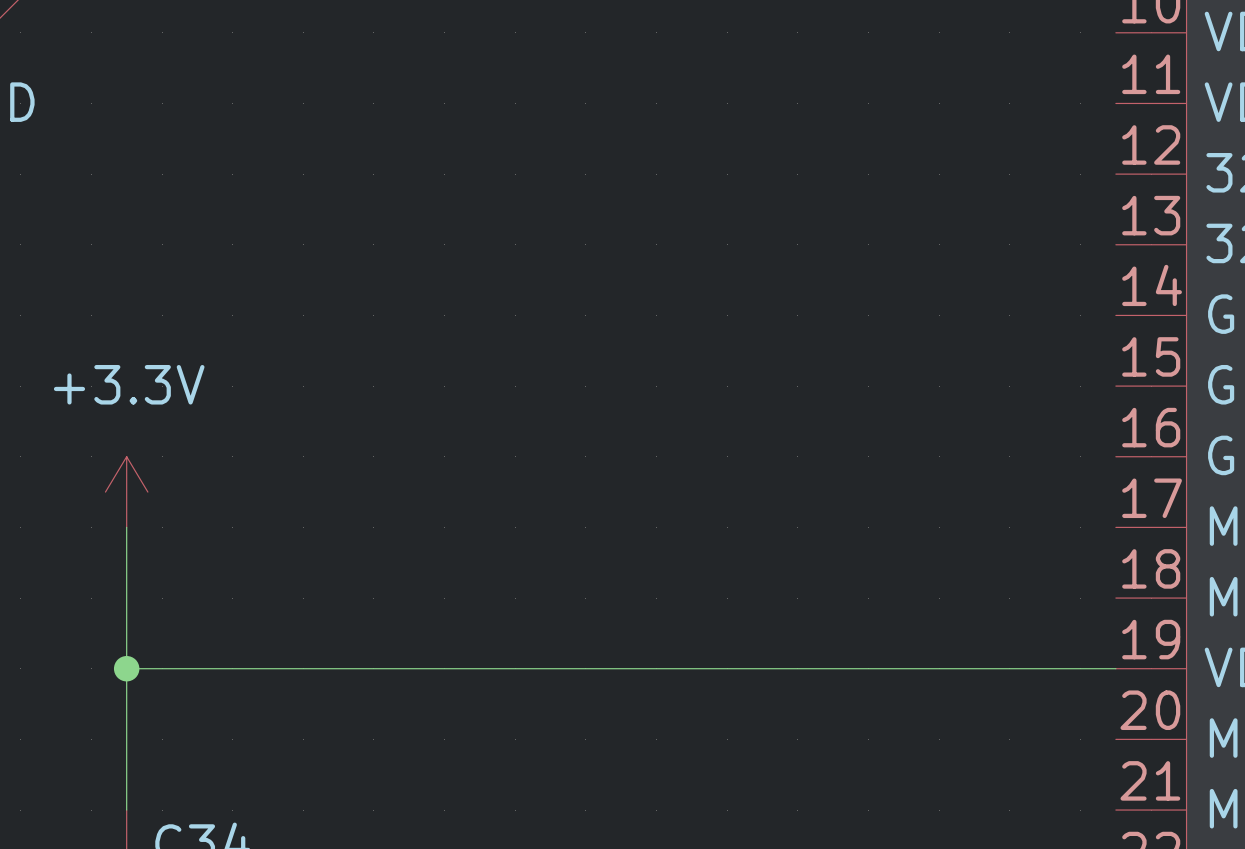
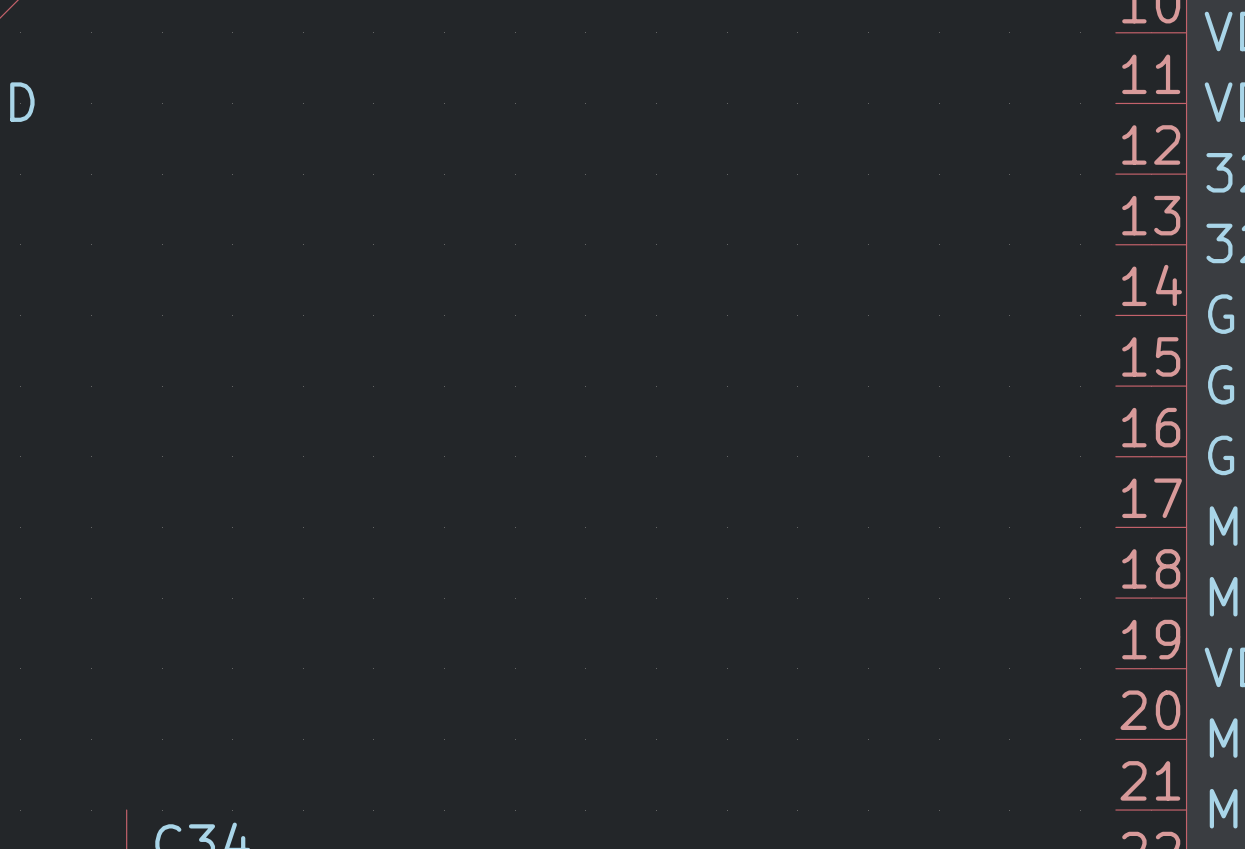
power symbol: +3.3V (126, 492) -> none
wire: (126, 527) (126, 810) -> none
wire: (126, 668) (1115, 668) -> none
junction: (126, 668) -> none

